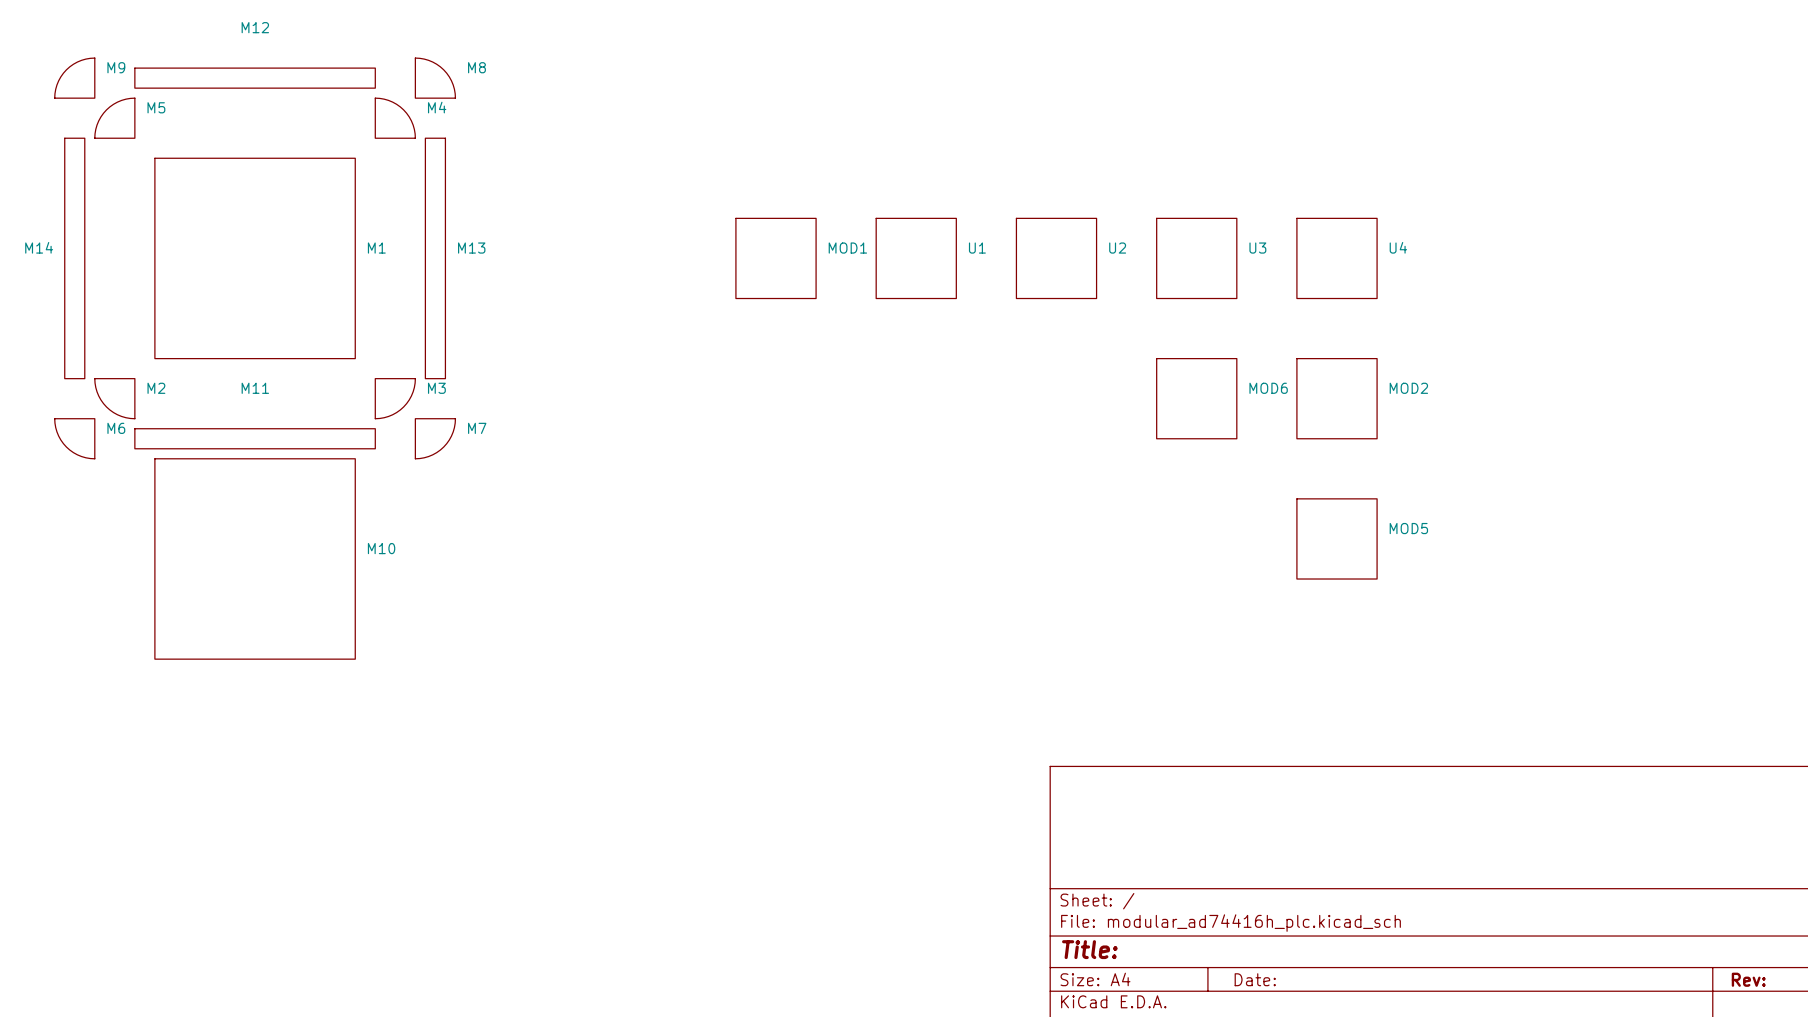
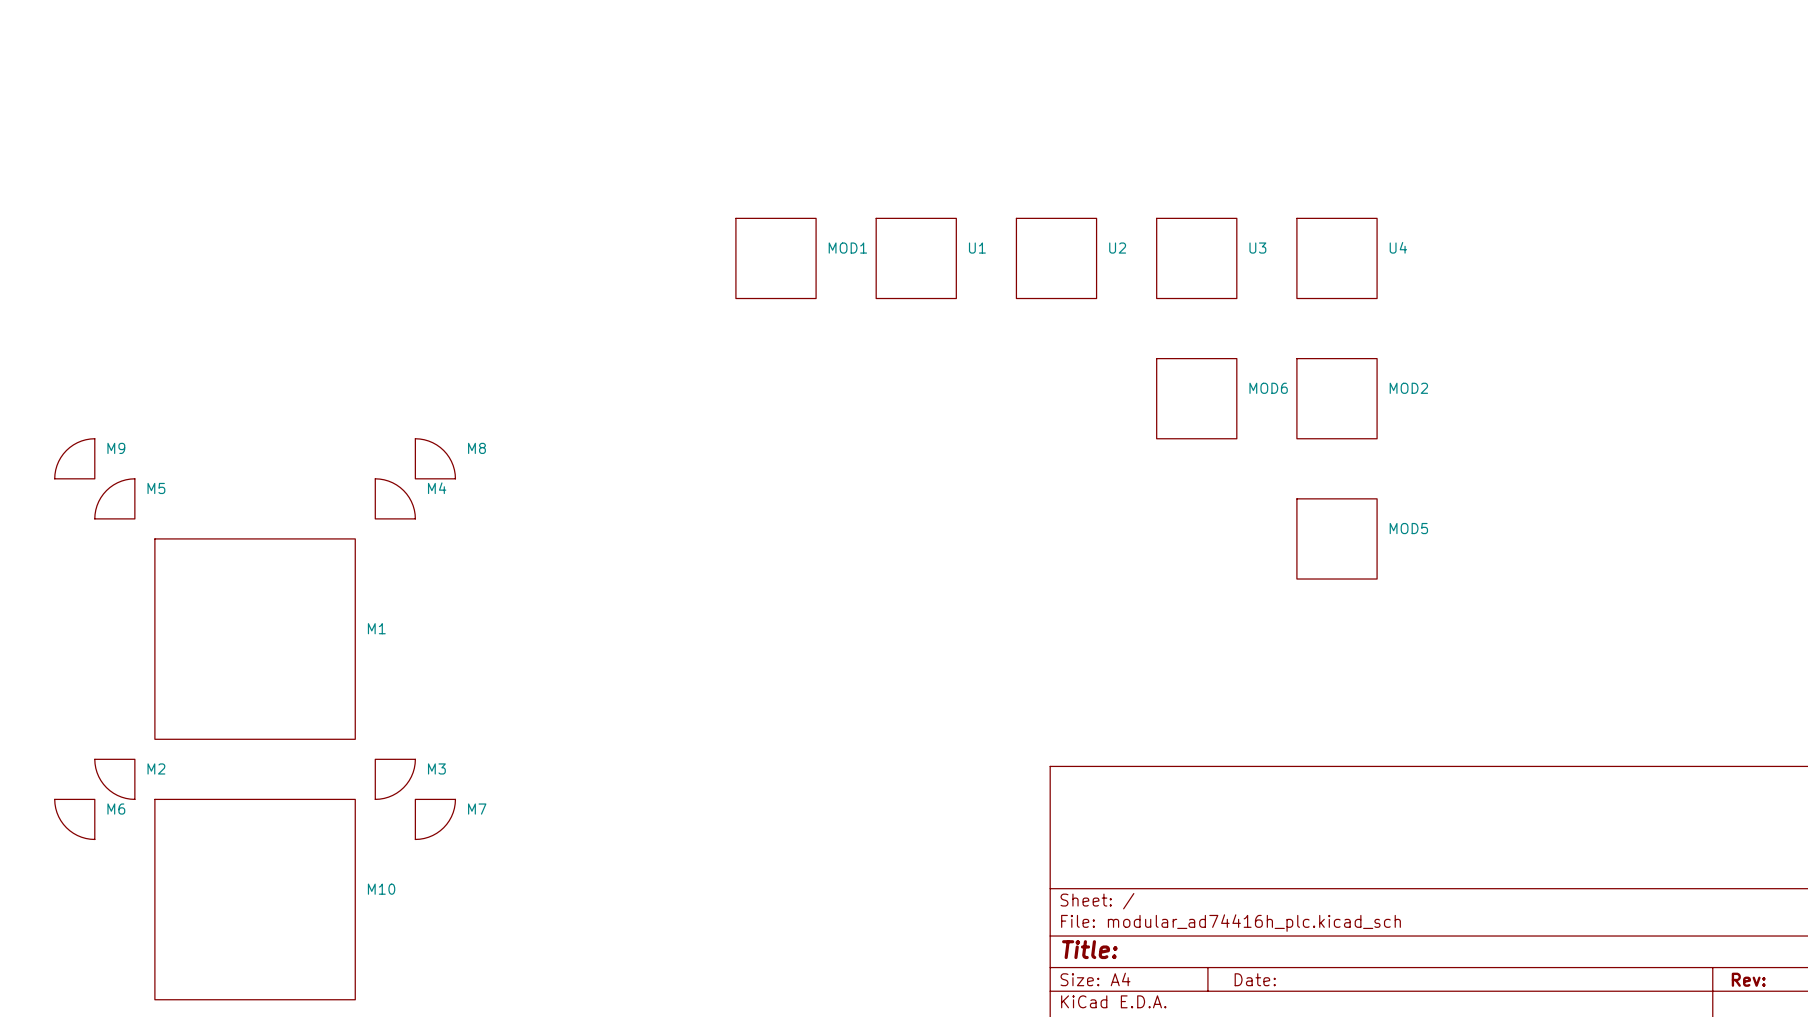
M9 position: (74, 78) -> (74, 458)
M12: (255, 78) -> none
M8 position: (435, 78) -> (435, 458)
M5 position: (114, 118) -> (114, 498)
M4 position: (395, 118) -> (395, 498)
M14: (74, 258) -> none
M1 position: (255, 258) -> (255, 639)
M13: (435, 258) -> none
M2 position: (114, 398) -> (114, 779)
M3 position: (395, 398) -> (395, 779)
M6 position: (74, 438) -> (74, 819)
M11: (255, 438) -> none
M7 position: (435, 438) -> (435, 819)
M10 position: (255, 558) -> (255, 899)

